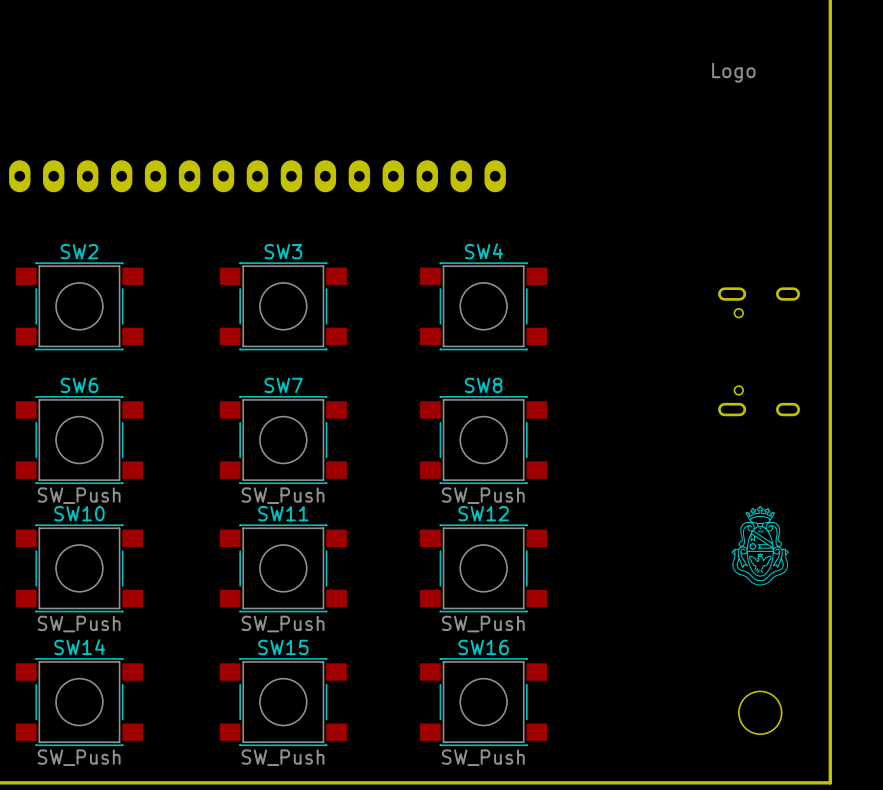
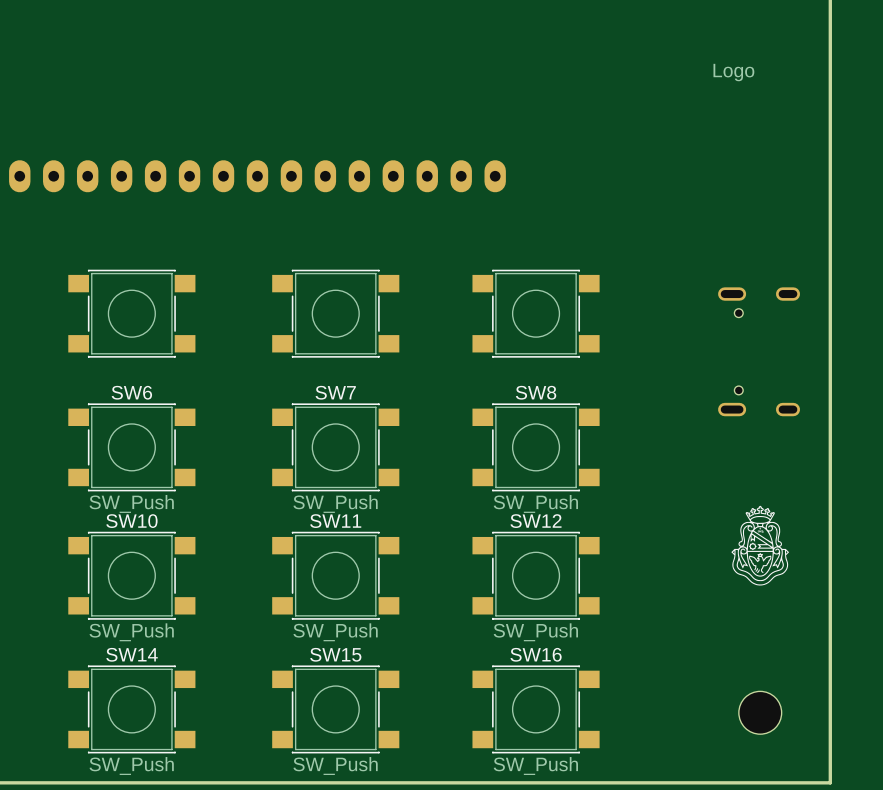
SW2: (79, 306) -> none
SW3: (283, 306) -> none
SW4: (483, 306) -> none
part: none -> (131, 313)
part: none -> (335, 313)
part: none -> (536, 313)
SW6 position: (79, 440) -> (131, 447)
SW7 position: (283, 440) -> (335, 447)
SW8 position: (483, 440) -> (536, 447)
SW10 position: (79, 568) -> (131, 575)
SW11 position: (283, 568) -> (335, 575)
SW12 position: (483, 568) -> (536, 575)
SW14 position: (79, 702) -> (131, 709)
SW15 position: (283, 702) -> (335, 709)
SW16 position: (483, 702) -> (536, 709)

